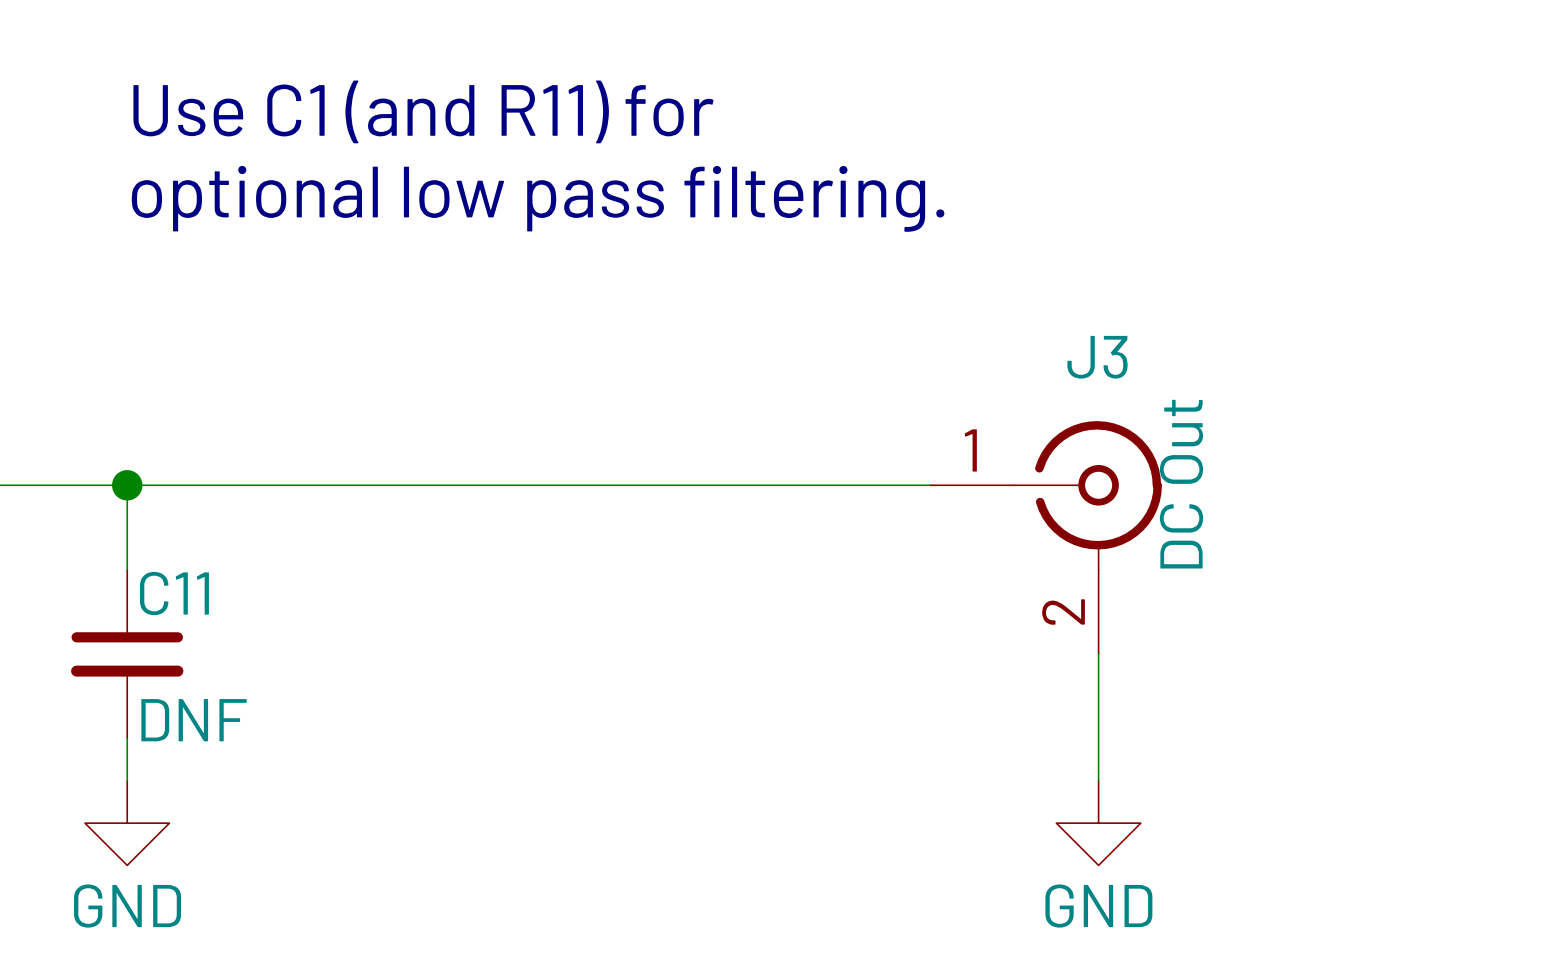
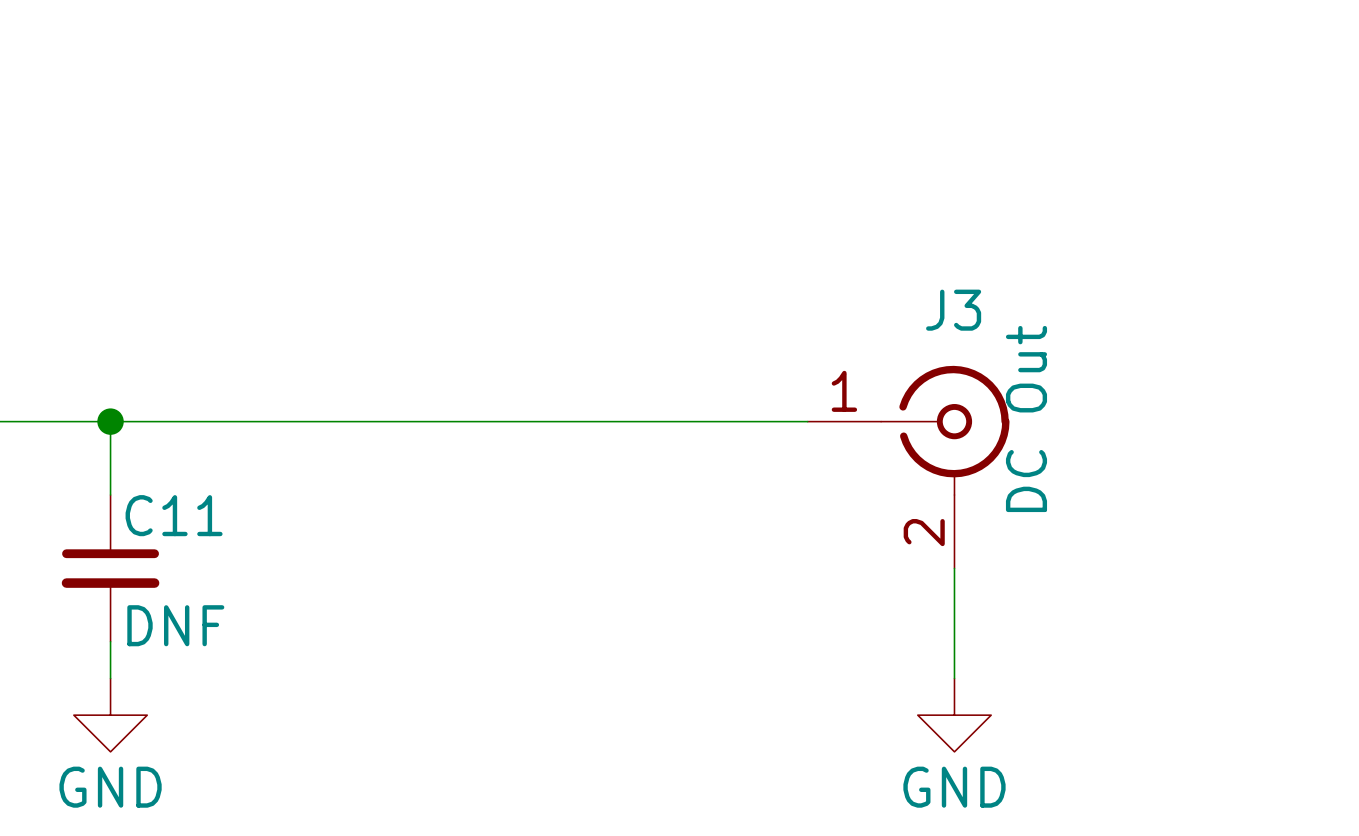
text: Use C1 (and R11) for (423, 111) -> none
text: optional low pass filtering. (538, 198) -> none

